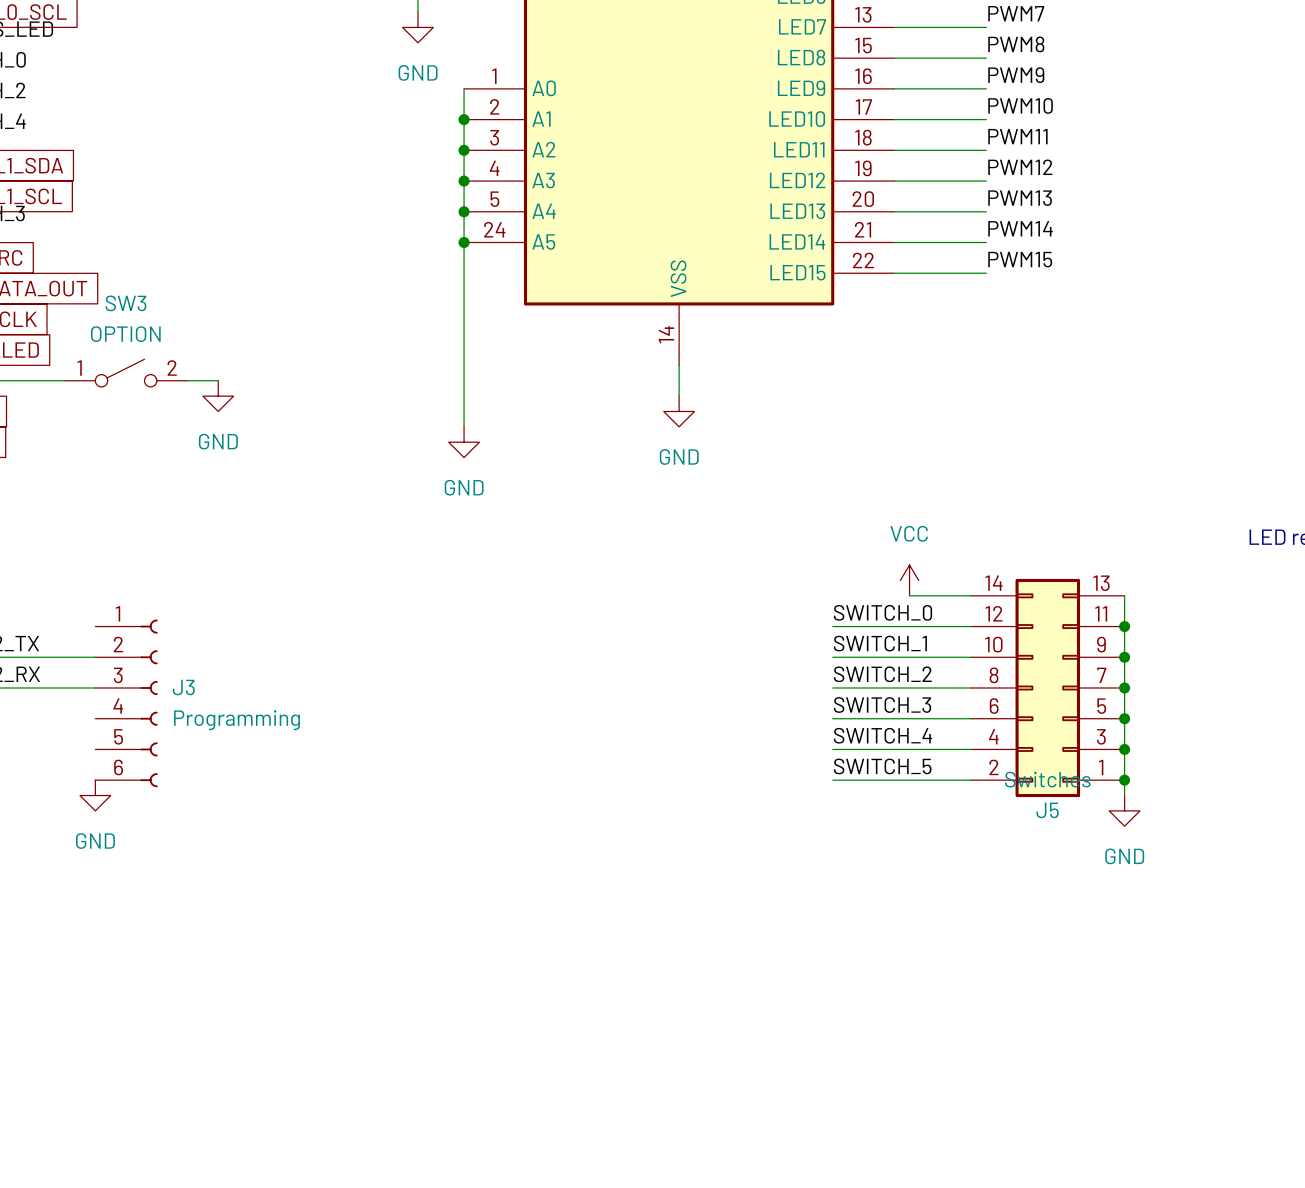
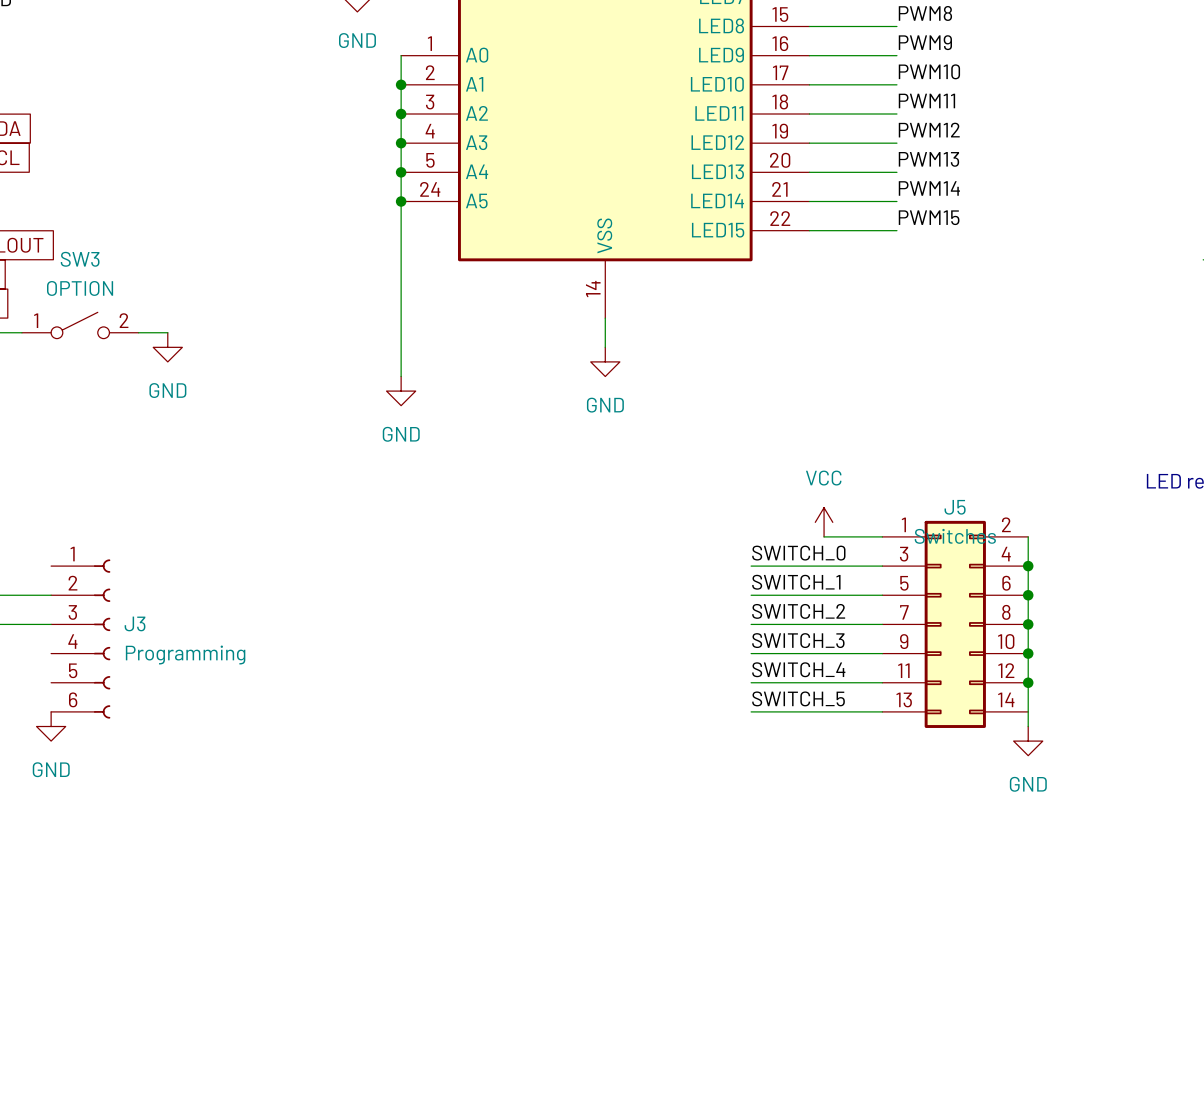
J5 rotation: 0° (1047, 688) -> 180° (955, 624)
junction: (1124, 780) -> none

